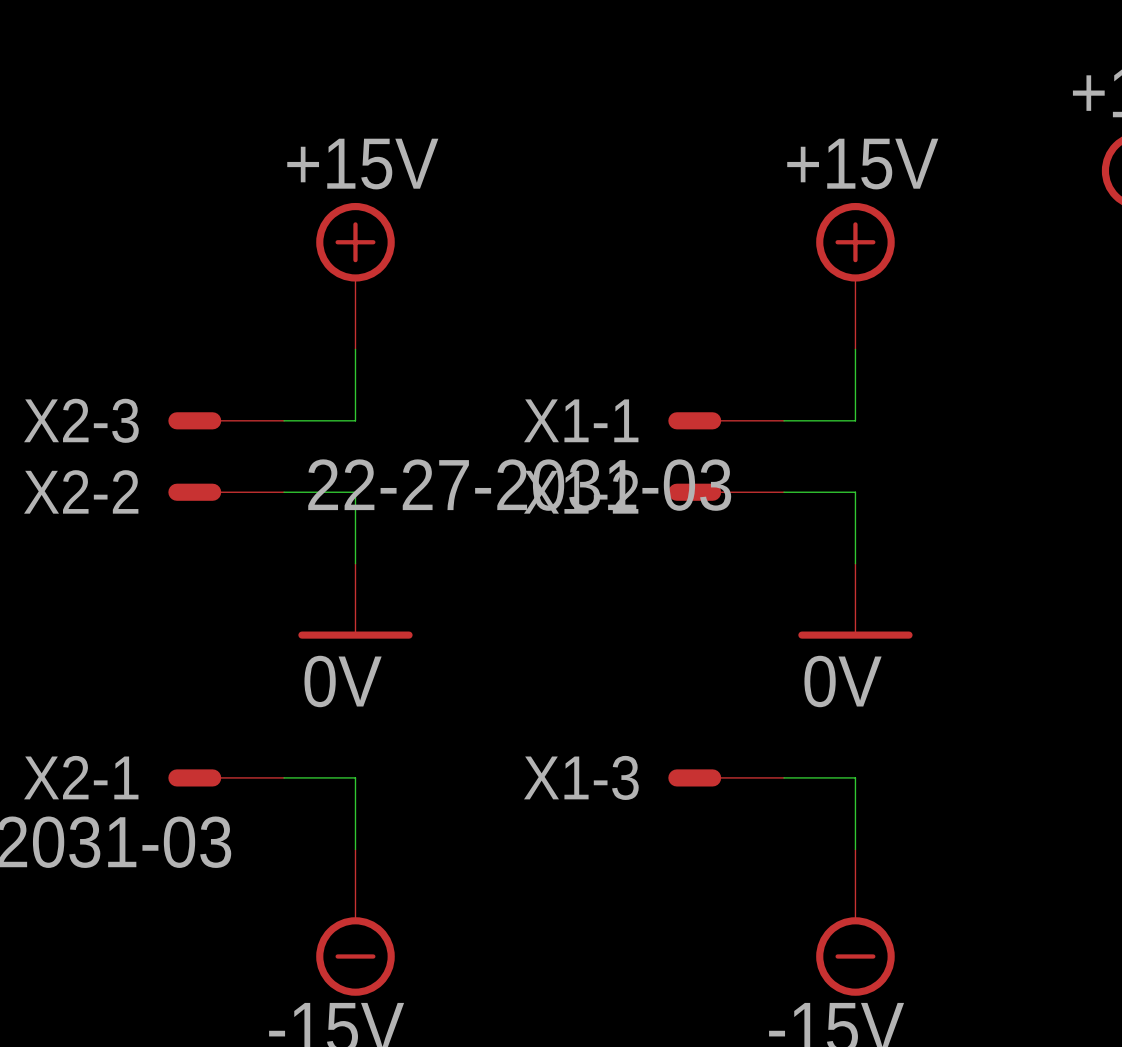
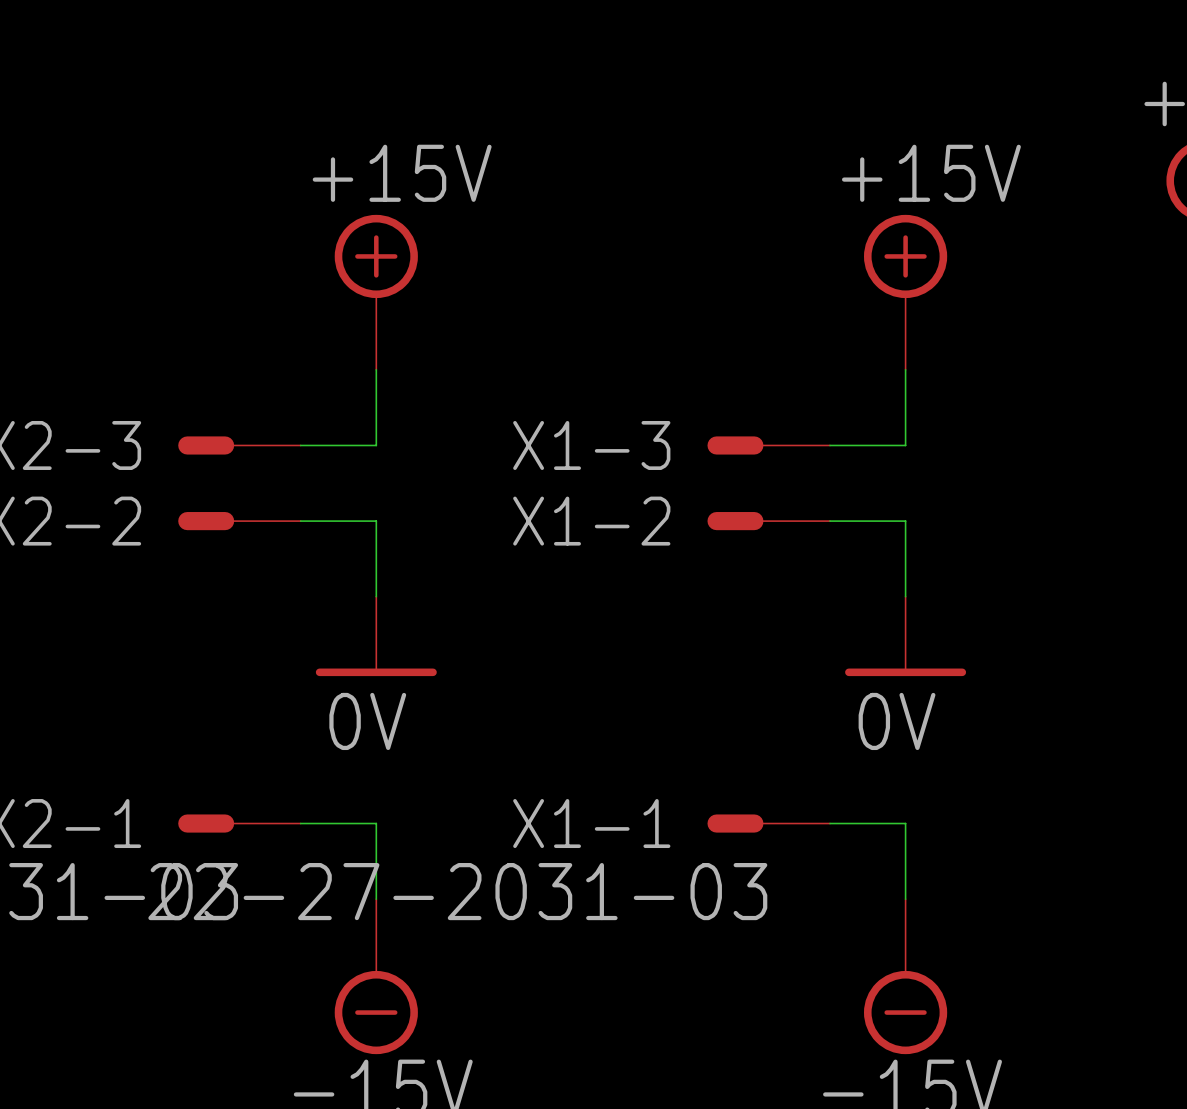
X1-1 name: X1-1 (581, 420) -> X1-3 (591, 445)
X1-1 value: 22-27-2031-03 (519, 485) -> none
X1-3 name: X1-3 (581, 777) -> X1-1 (591, 823)
X1-3 value: none -> 22-27-2031-03 (457, 891)

